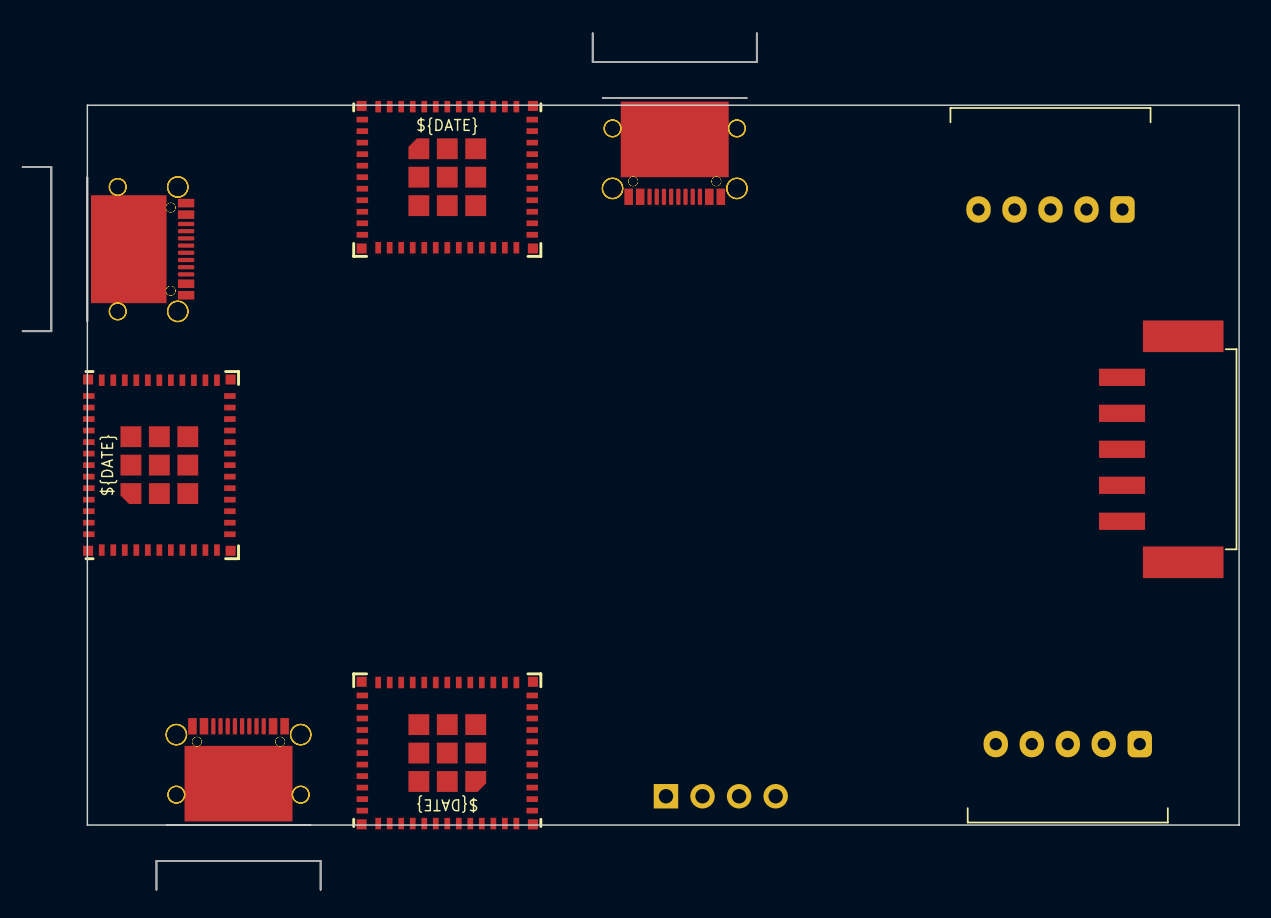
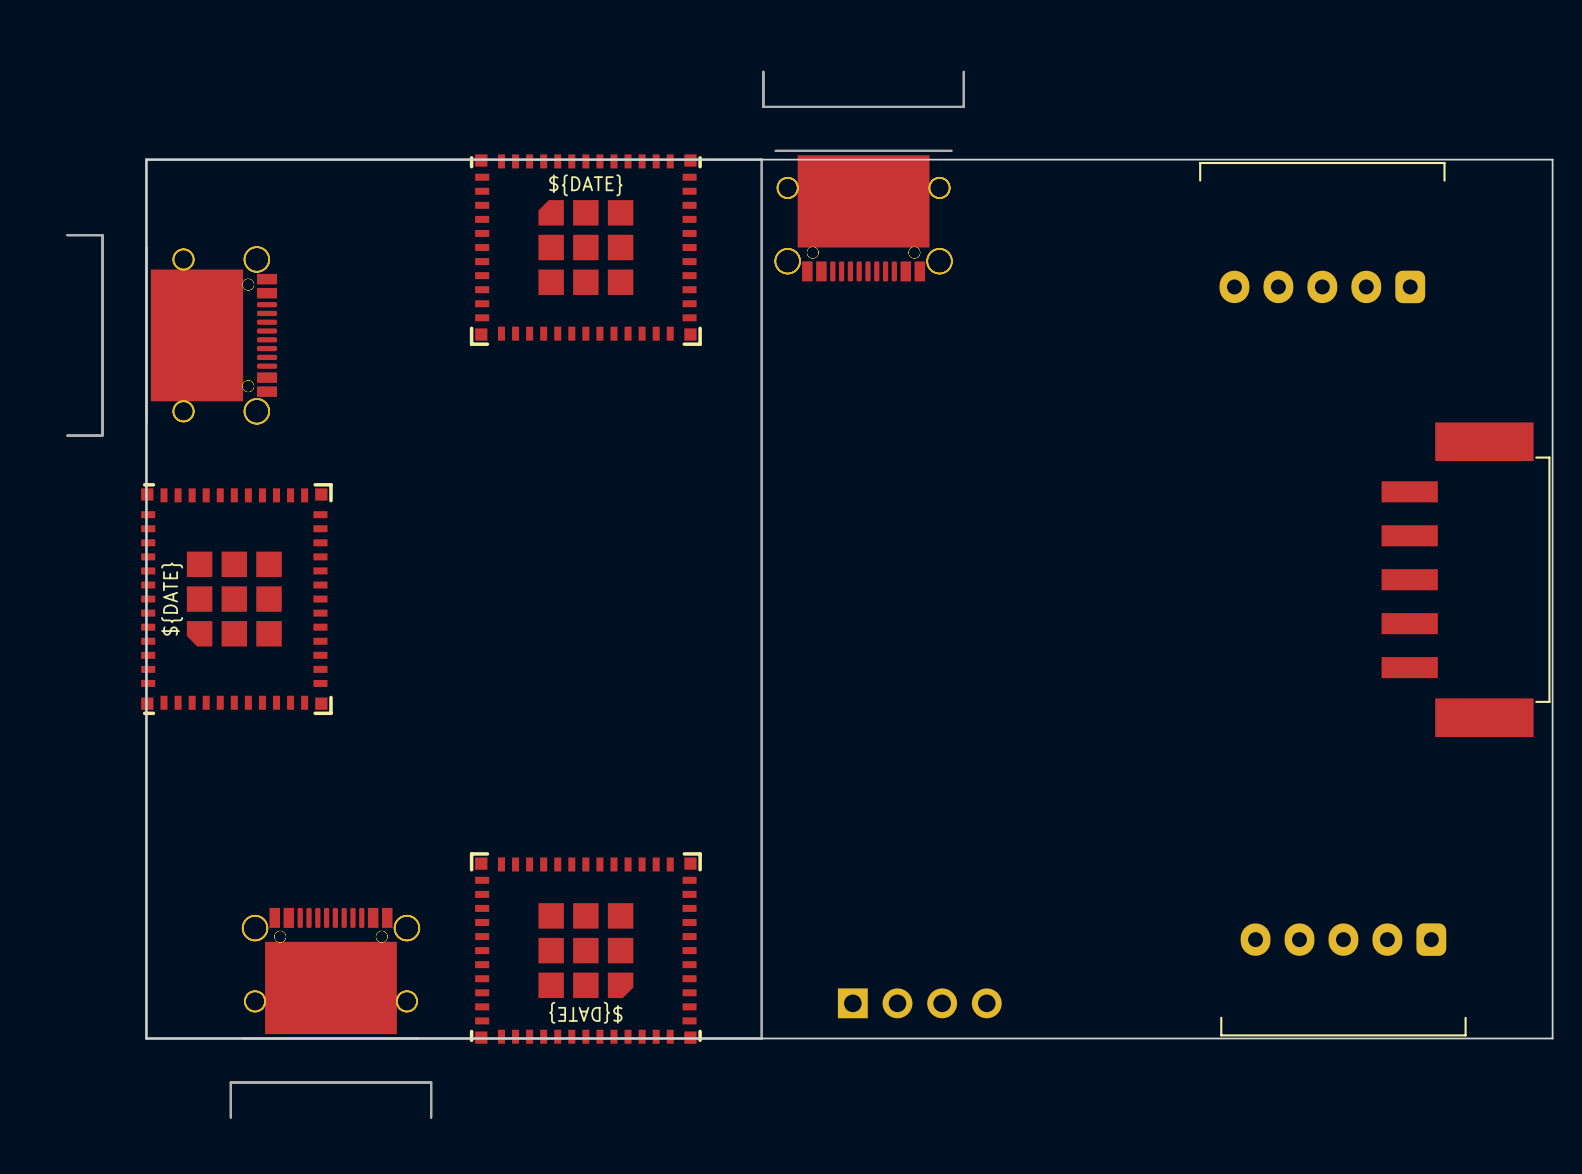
line: none -> (146, 159) (761, 159) (761, 1038) (146, 1038) (146, 159)

